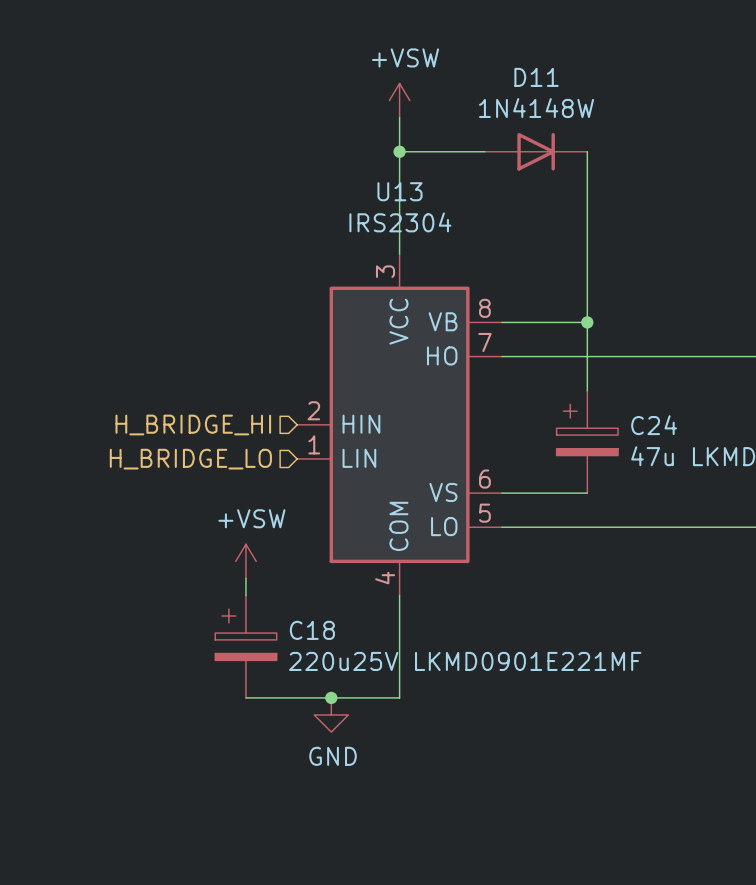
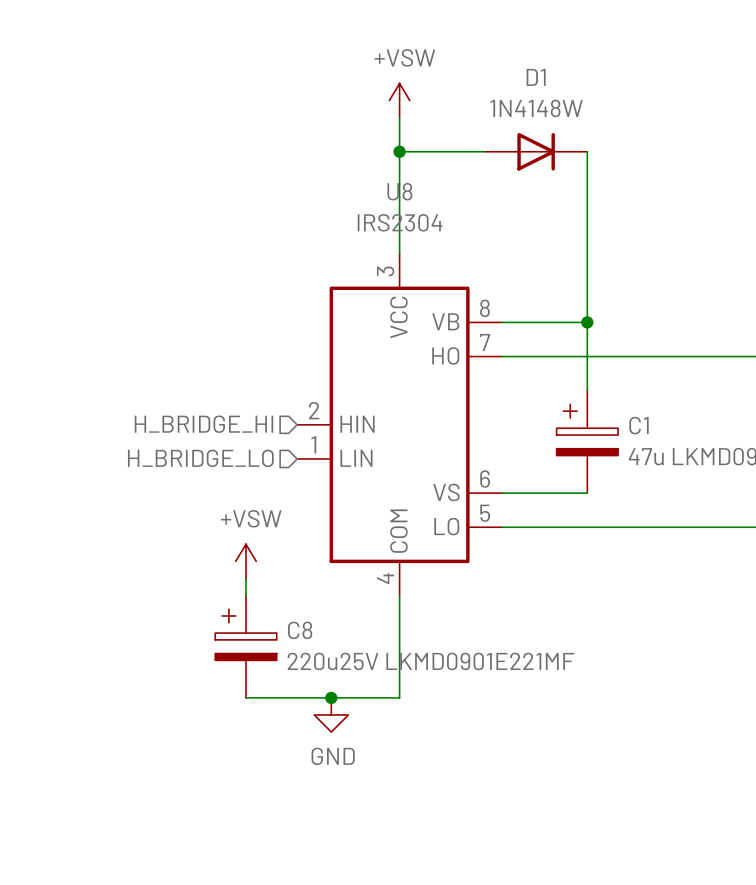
D11 name: D11 (536, 77) -> D1 (536, 77)
U13 name: U13 (399, 191) -> U8 (399, 191)
C24 name: C24 (654, 425) -> C1 (639, 425)
C18 name: C18 (312, 630) -> C8 (300, 630)

